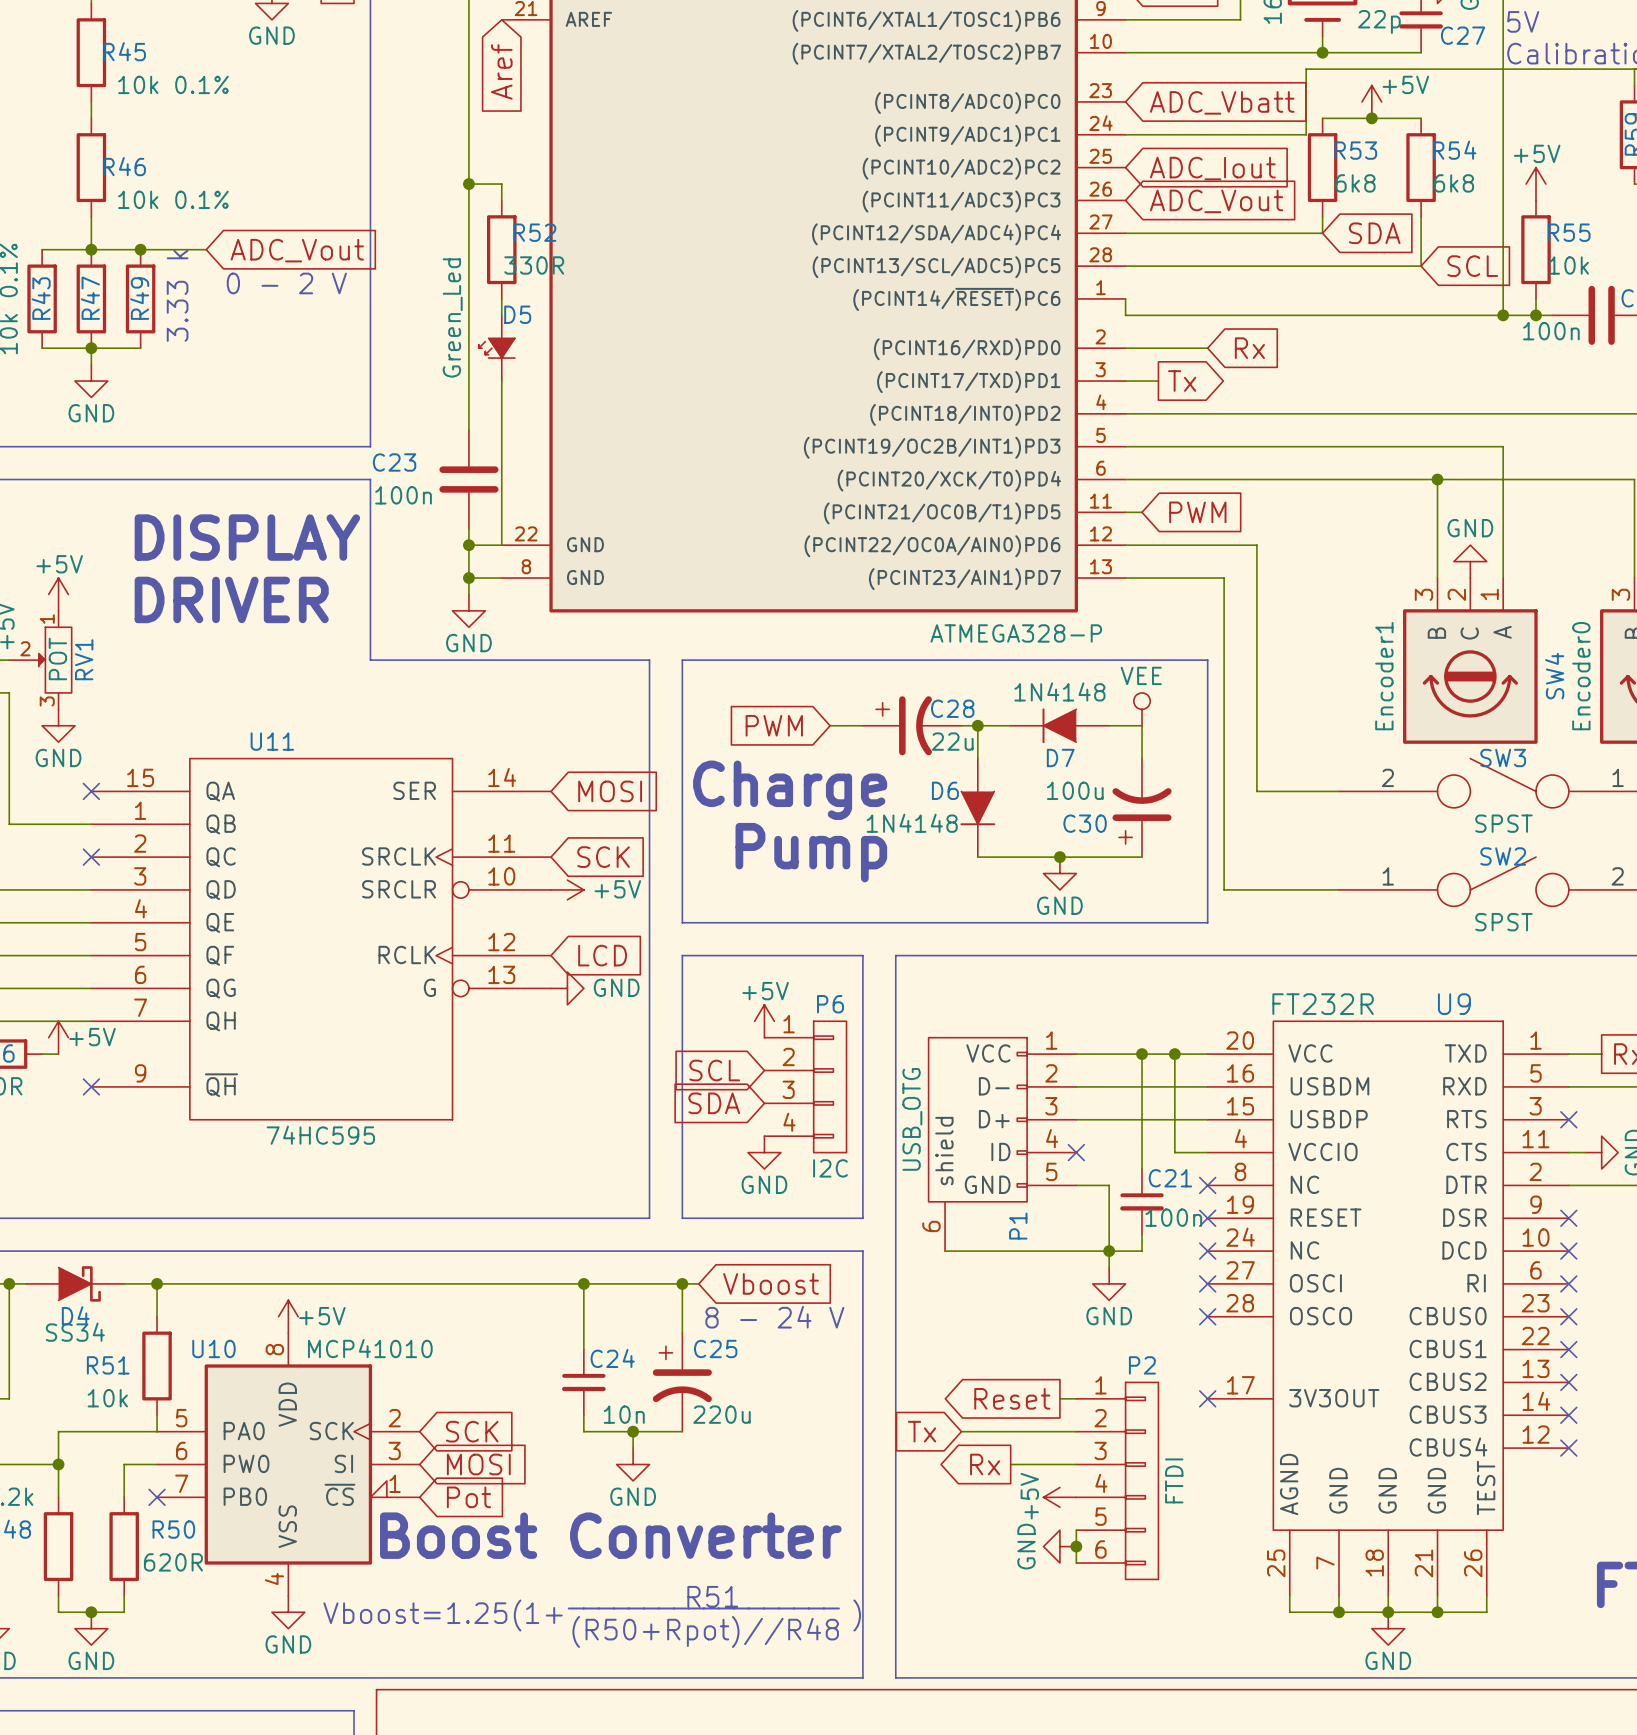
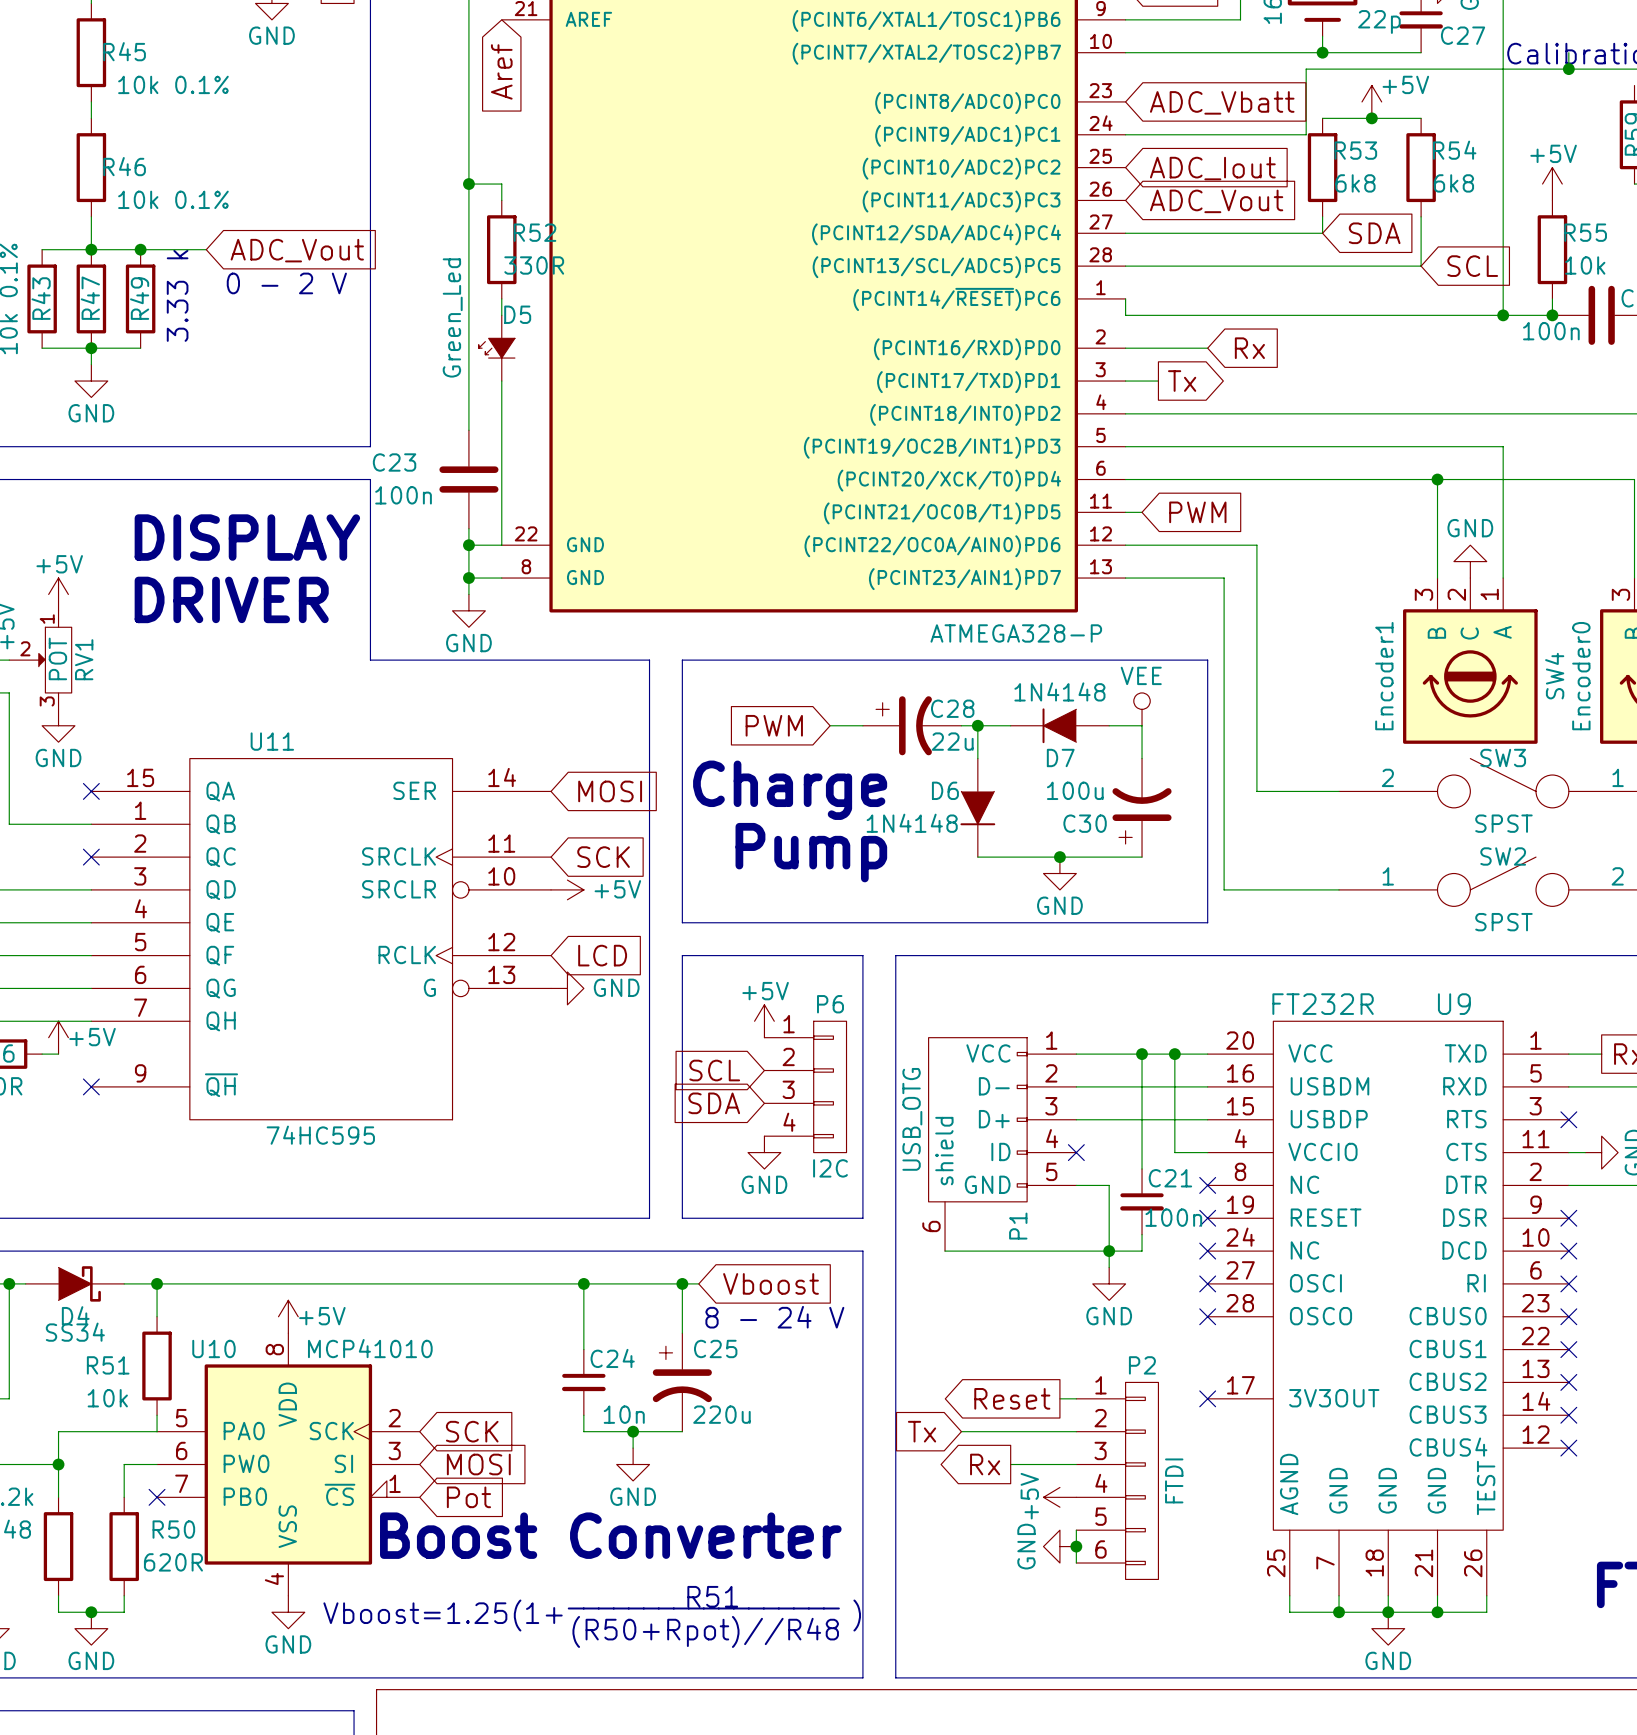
text: 5V (1523, 21) -> none
junction: none -> (1568, 69)
wire: (1634, 69) (1634, 85) -> (1568, 52) (1568, 69)
power symbol position: +5V (1536, 184) -> +5V (1552, 184)
R55 position: (1536, 249) -> (1552, 249)
wire: (1536, 298) (1536, 315) -> (1552, 298) (1552, 315)
junction position: (1536, 315) -> (1552, 315)

